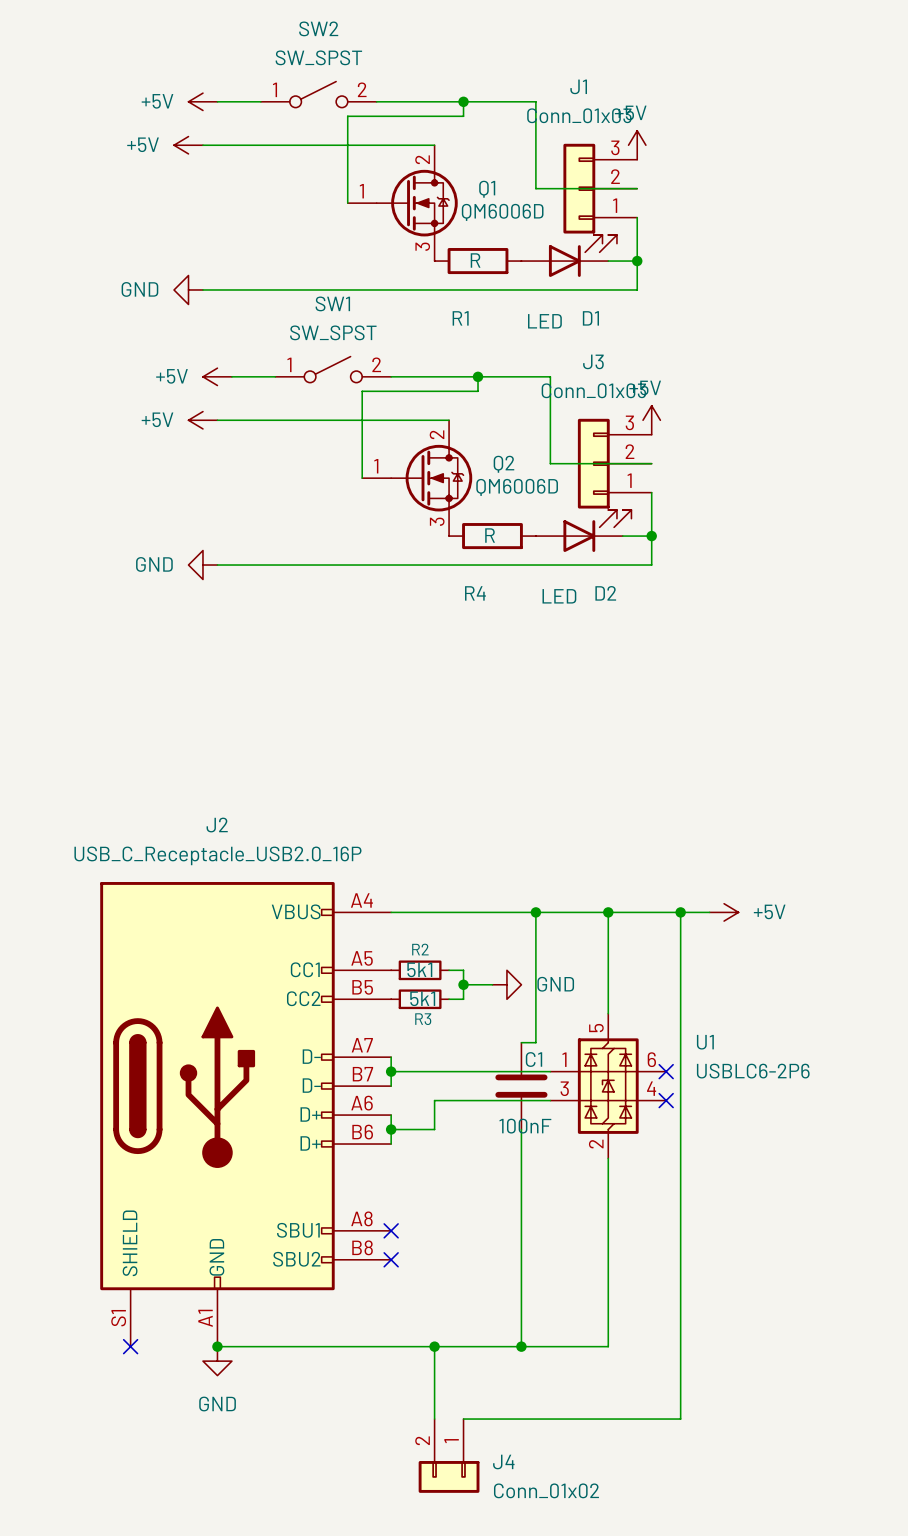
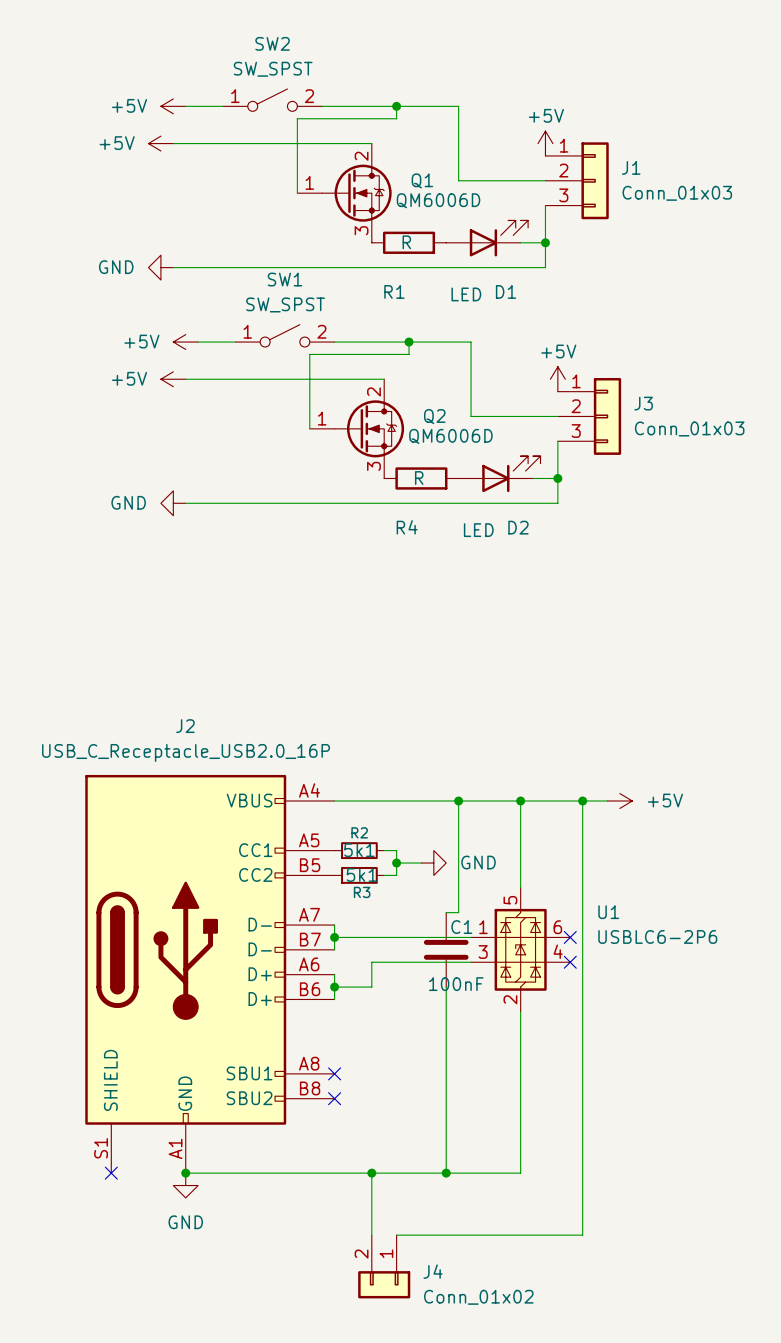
J1 name position: J1 (578, 86) -> J1 (631, 167)
J1 value position: Conn_01x03 (579, 115) -> Conn_01x03 (677, 193)
J1 rotation: 0° (579, 188) -> 180° (595, 180)
J1 position: (600, 188) -> (577, 180)
J3 name position: J3 (593, 361) -> J3 (643, 403)
J3 value position: Conn_01x03 (593, 390) -> Conn_01x03 (689, 428)
J3 rotation: 0° (593, 463) -> 180° (607, 416)
J3 position: (614, 463) -> (589, 416)

